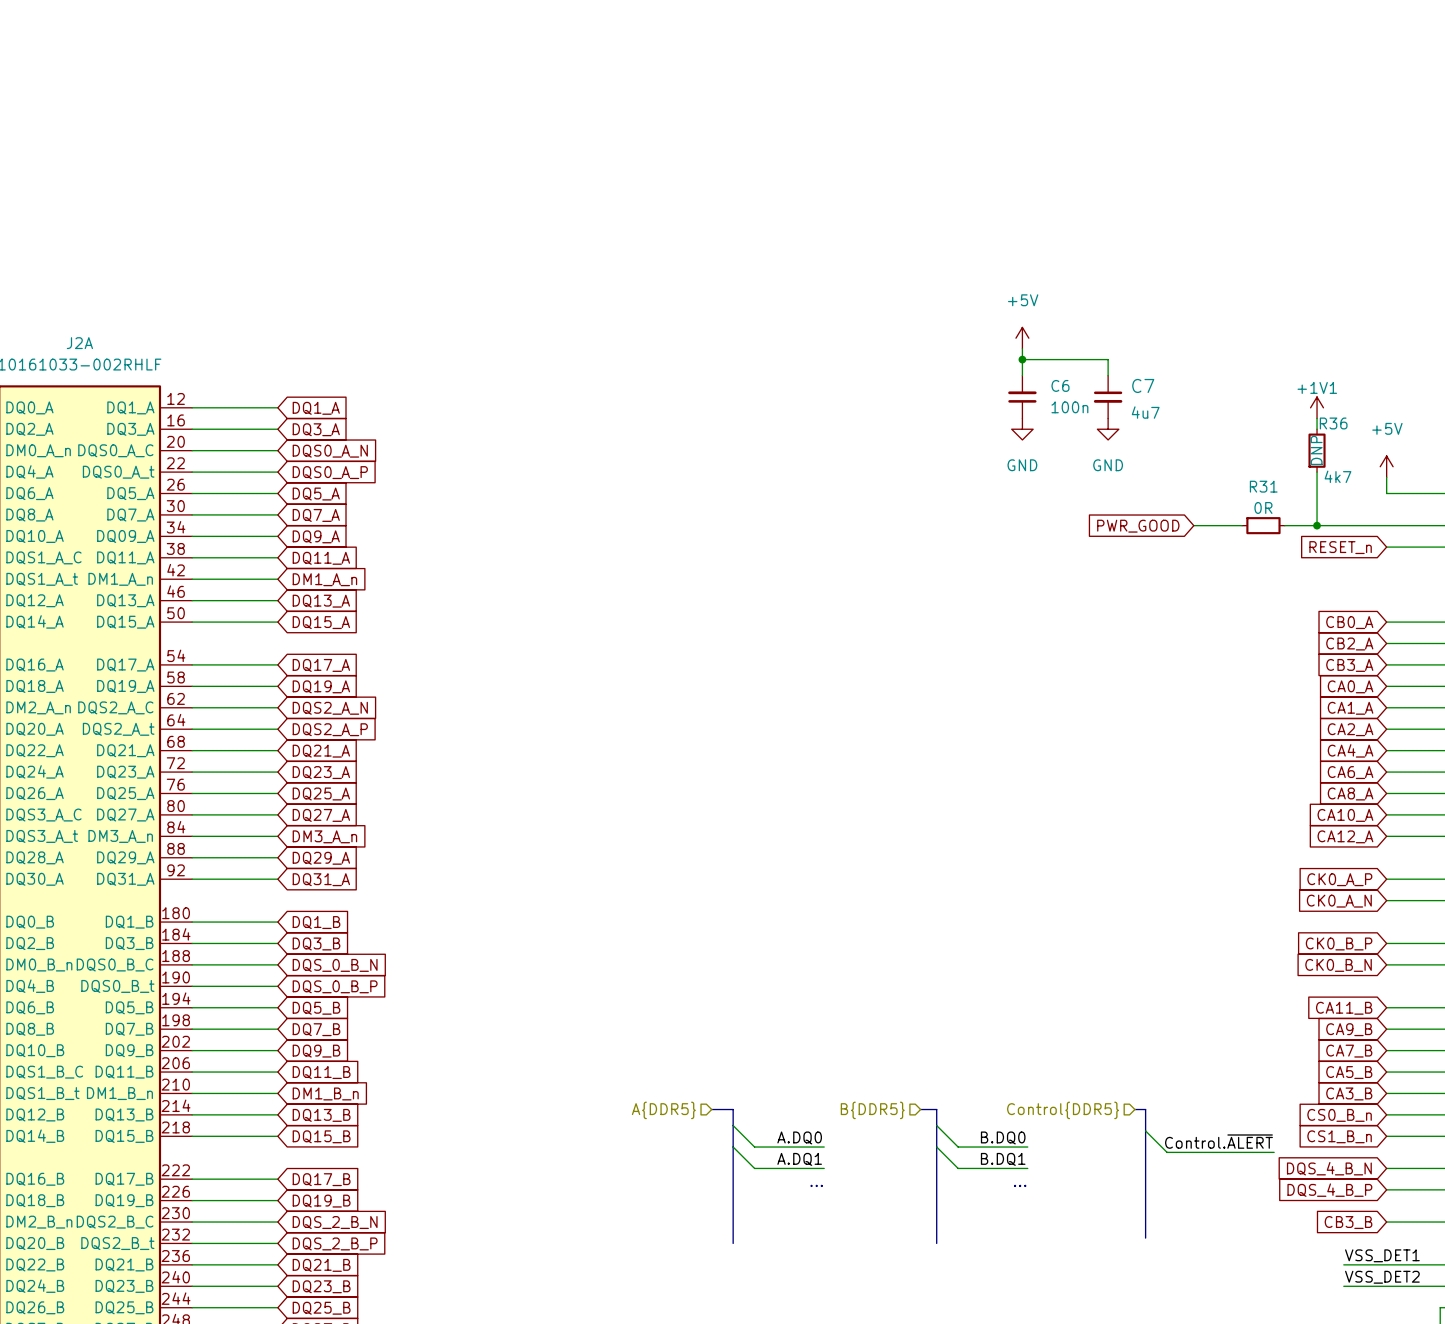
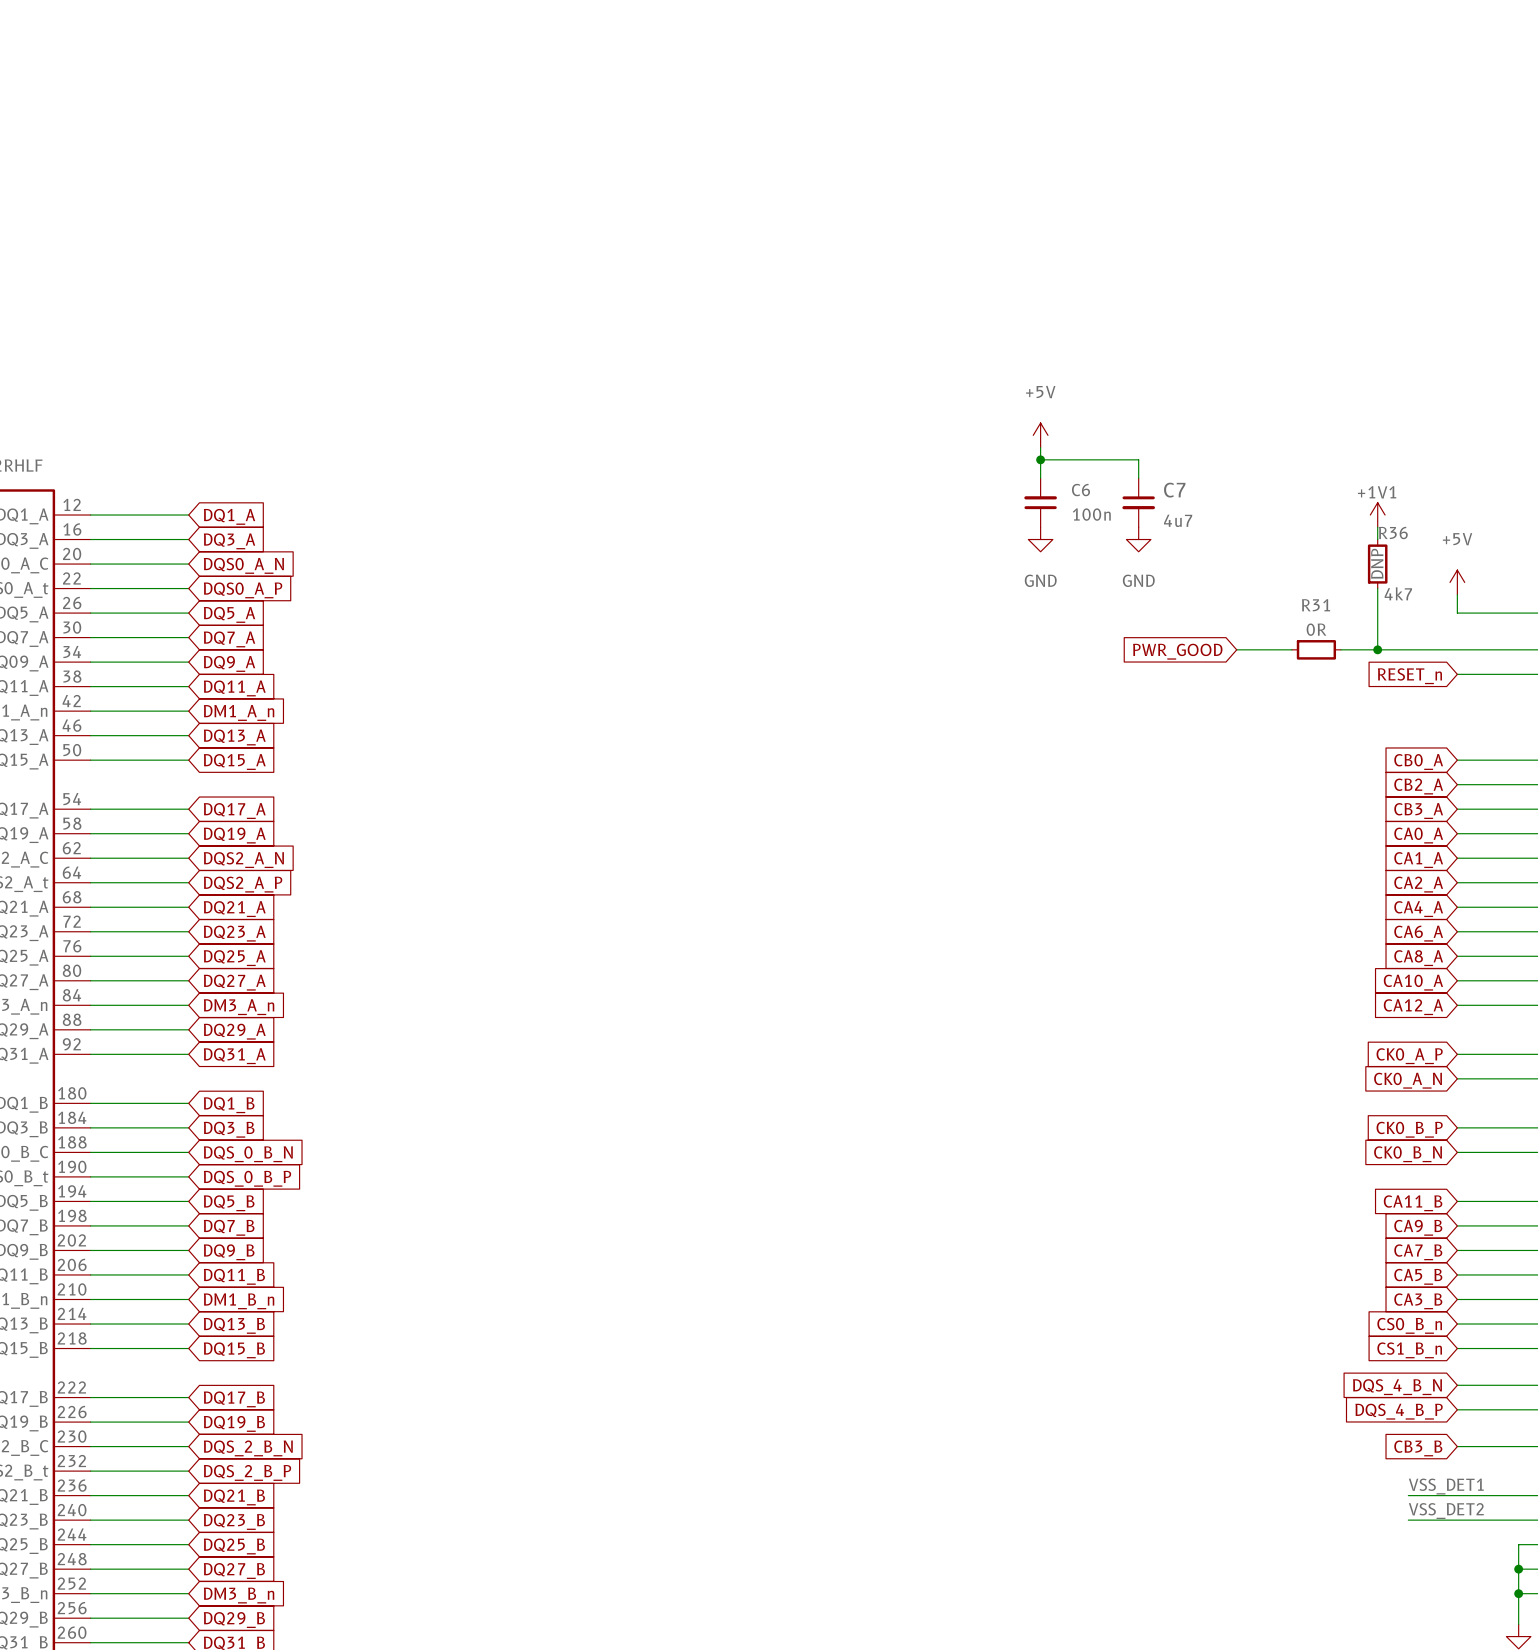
bus: (711, 1109) (733, 1109) (733, 1243) -> none
bus: (920, 1109) (936, 1109) (936, 1243) -> none
bus: (1134, 1109) (1145, 1109) (1145, 1238) -> none
hierarchical label: A{DDR5} (663, 1110) -> none
hierarchical label: B{DDR5} (872, 1110) -> none
hierarchical label: Control{DDR5} (1063, 1110) -> none
wire: (733, 1125) (754, 1147) (824, 1147) -> none
wire: (936, 1125) (958, 1147) (1027, 1147) -> none
wire: (1145, 1130) (1167, 1152) (1274, 1152) -> none
label: A.DQ0 (799, 1137) -> none
label: B.DQ0 (1003, 1137) -> none
label: Control.~{ALERT} (1218, 1141) -> none
wire: (733, 1147) (754, 1168) (824, 1168) -> none
wire: (936, 1147) (958, 1168) (1027, 1168) -> none
label: A.DQ1 (799, 1159) -> none
label: B.DQ1 (1003, 1159) -> none
text: ... (816, 1185) -> none
text: ... (1020, 1185) -> none

